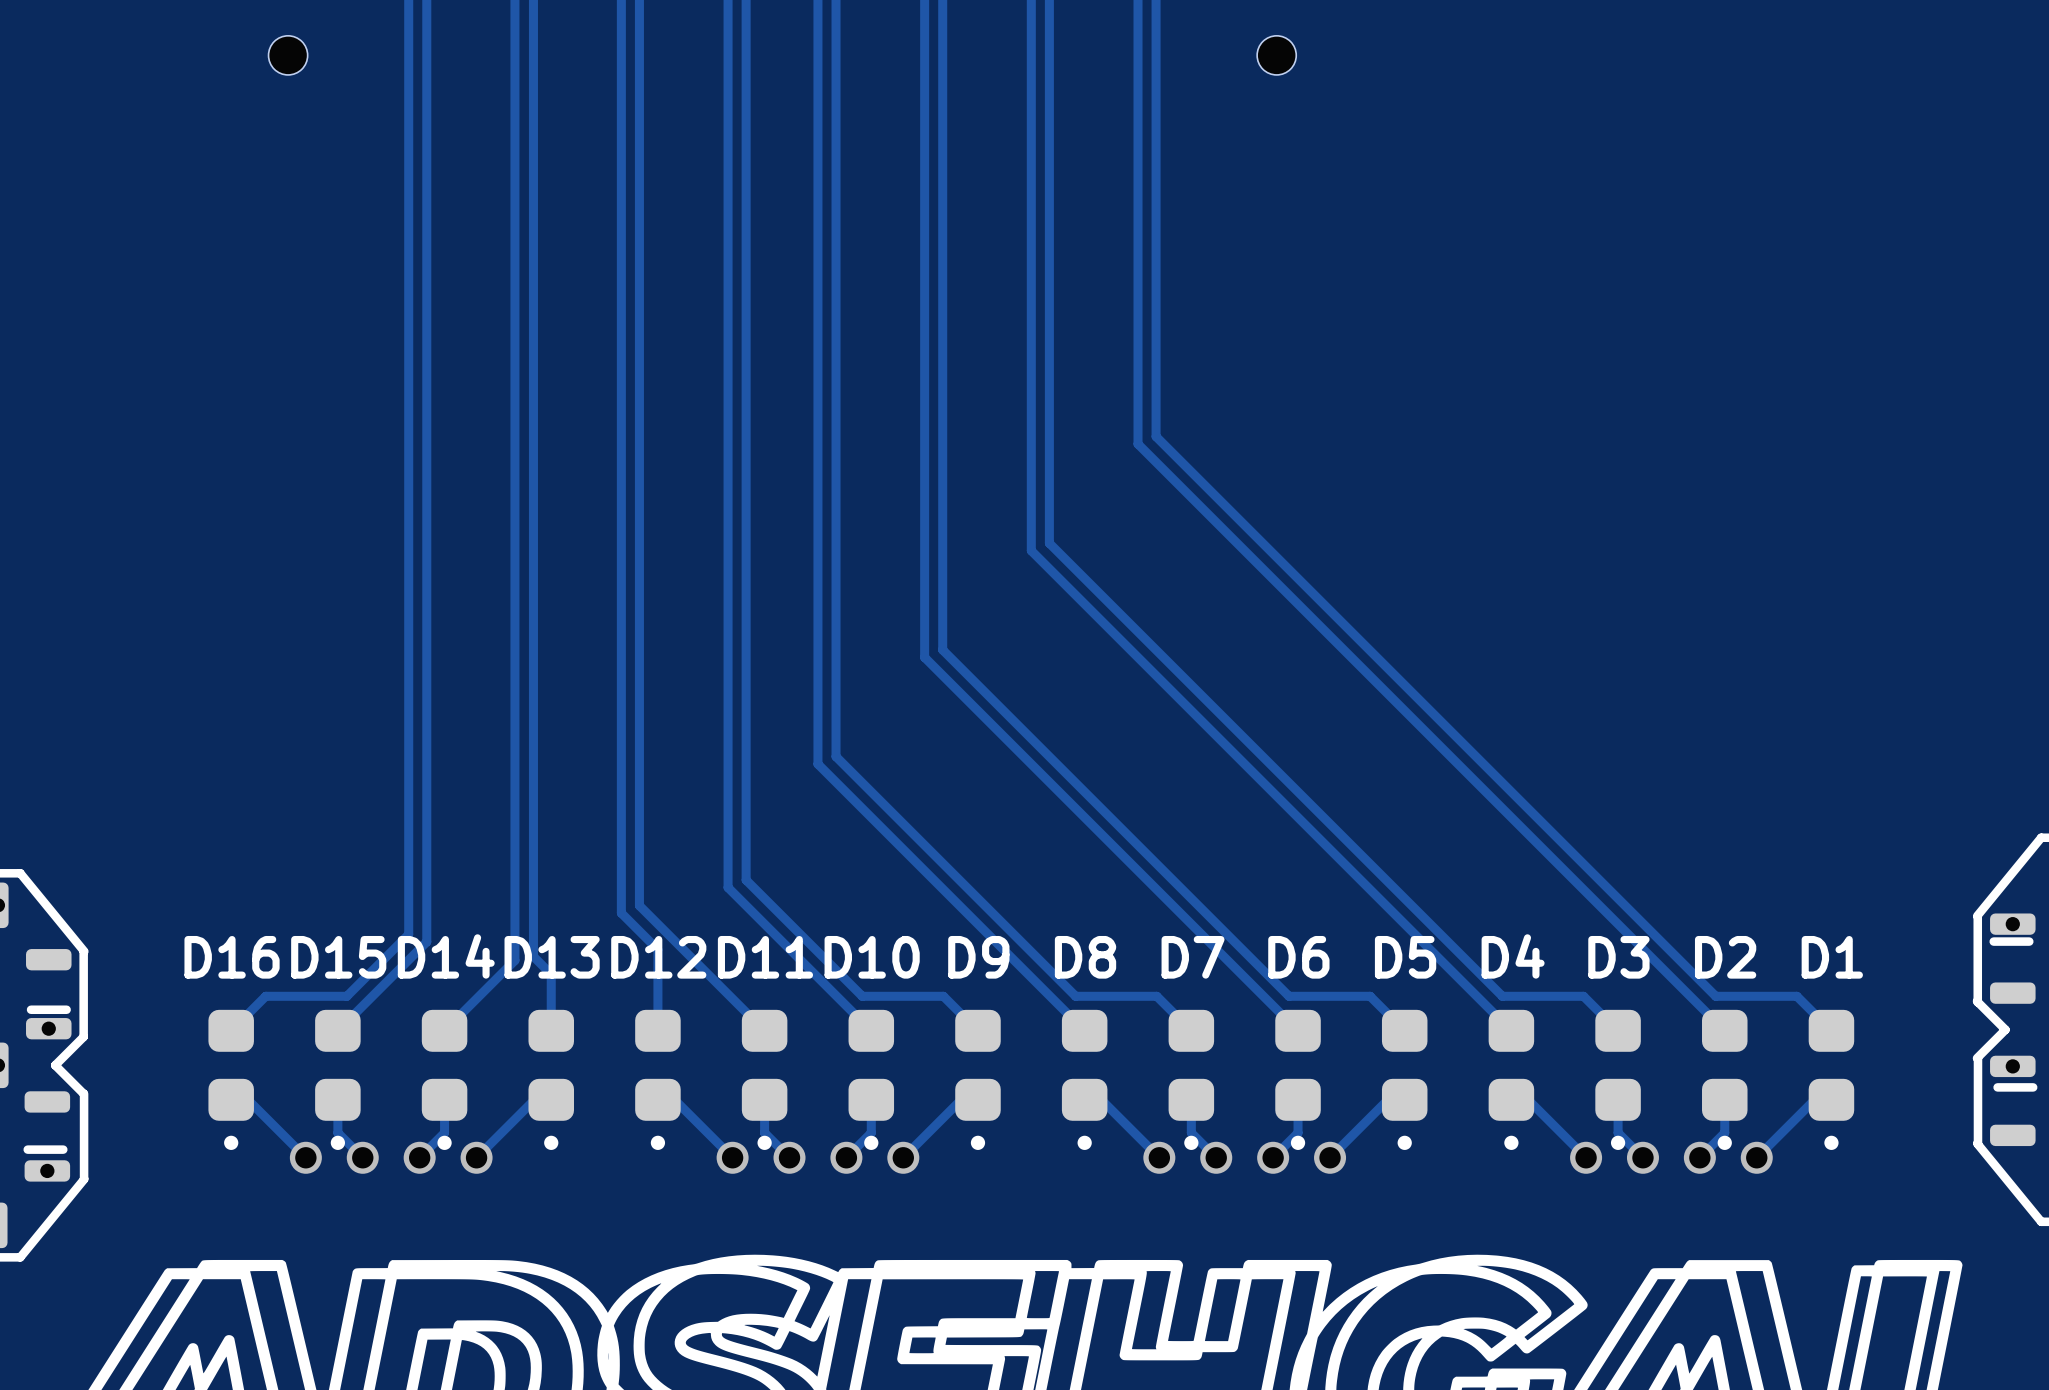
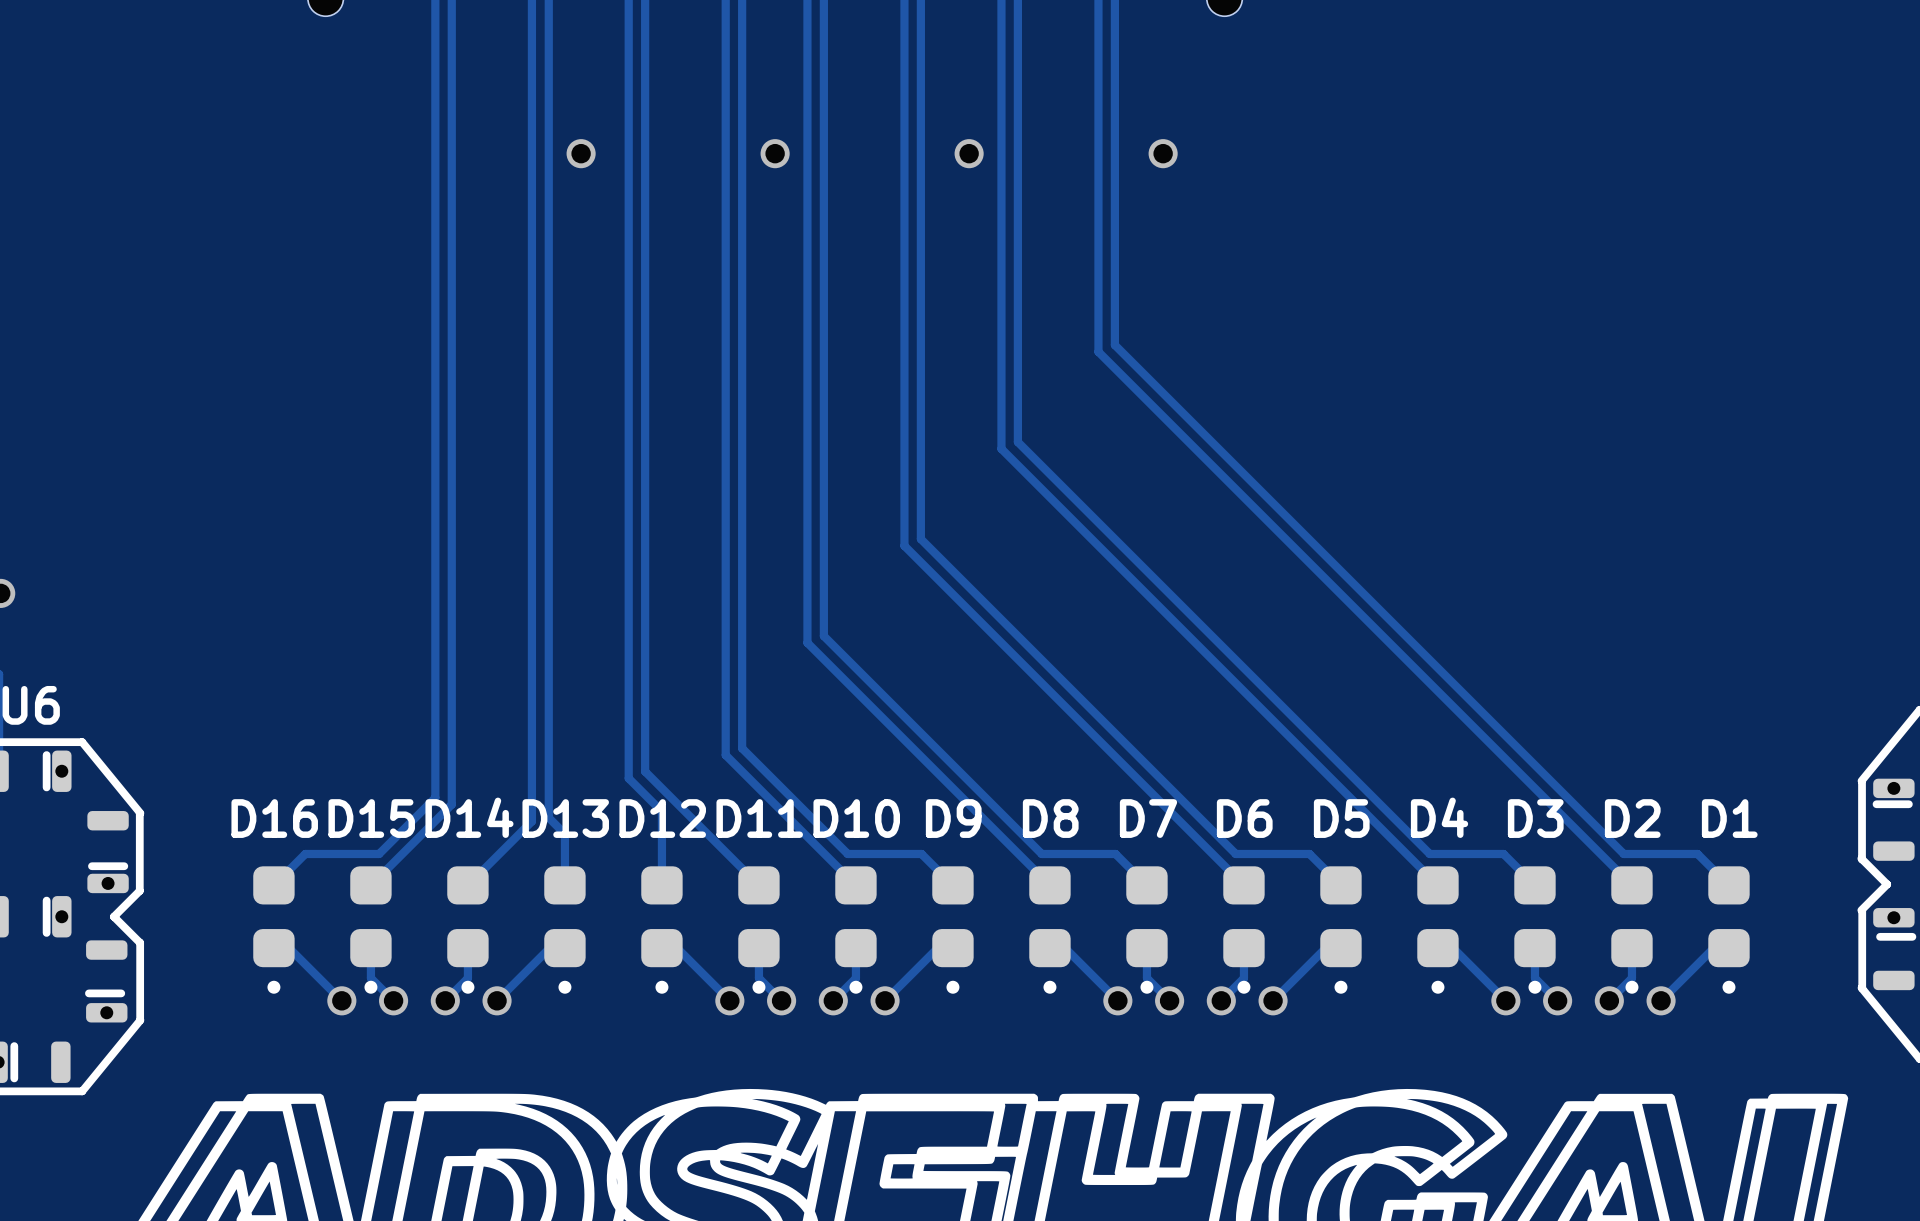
via: none -> (581, 153)
via: none -> (775, 153)
via: none -> (969, 153)
via: none -> (1163, 153)

